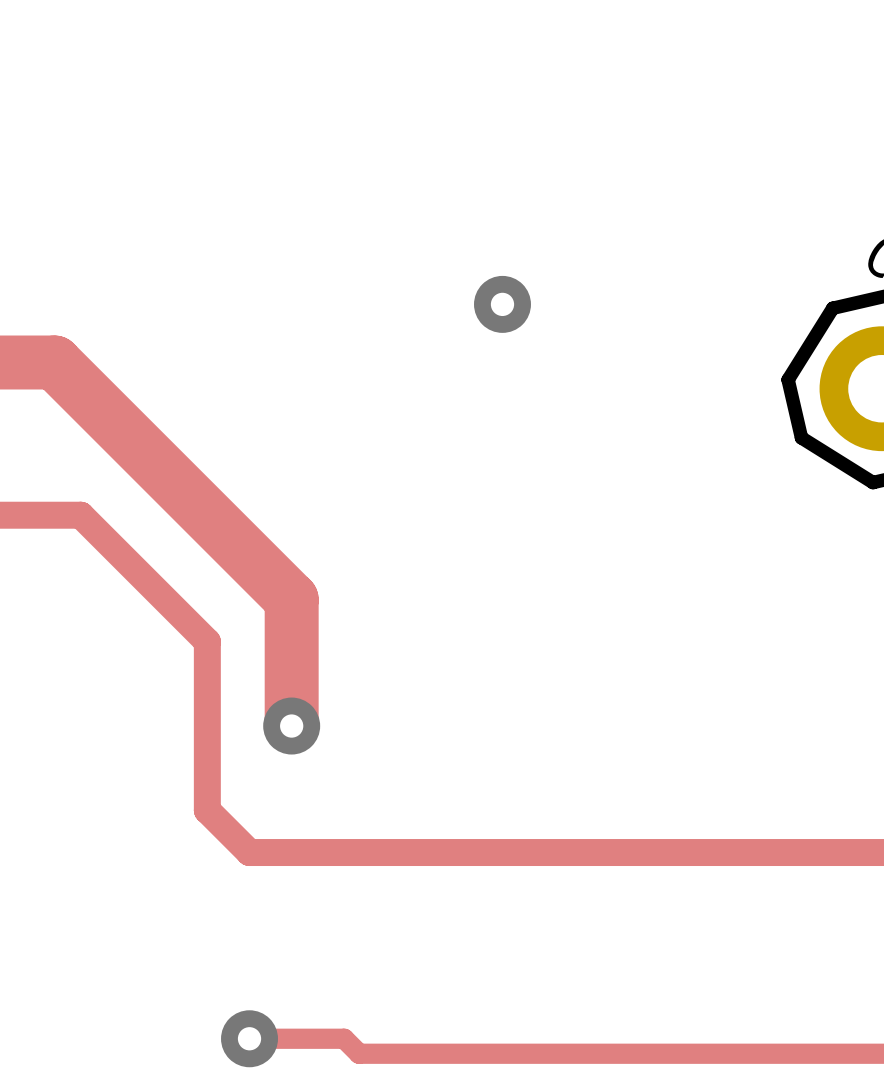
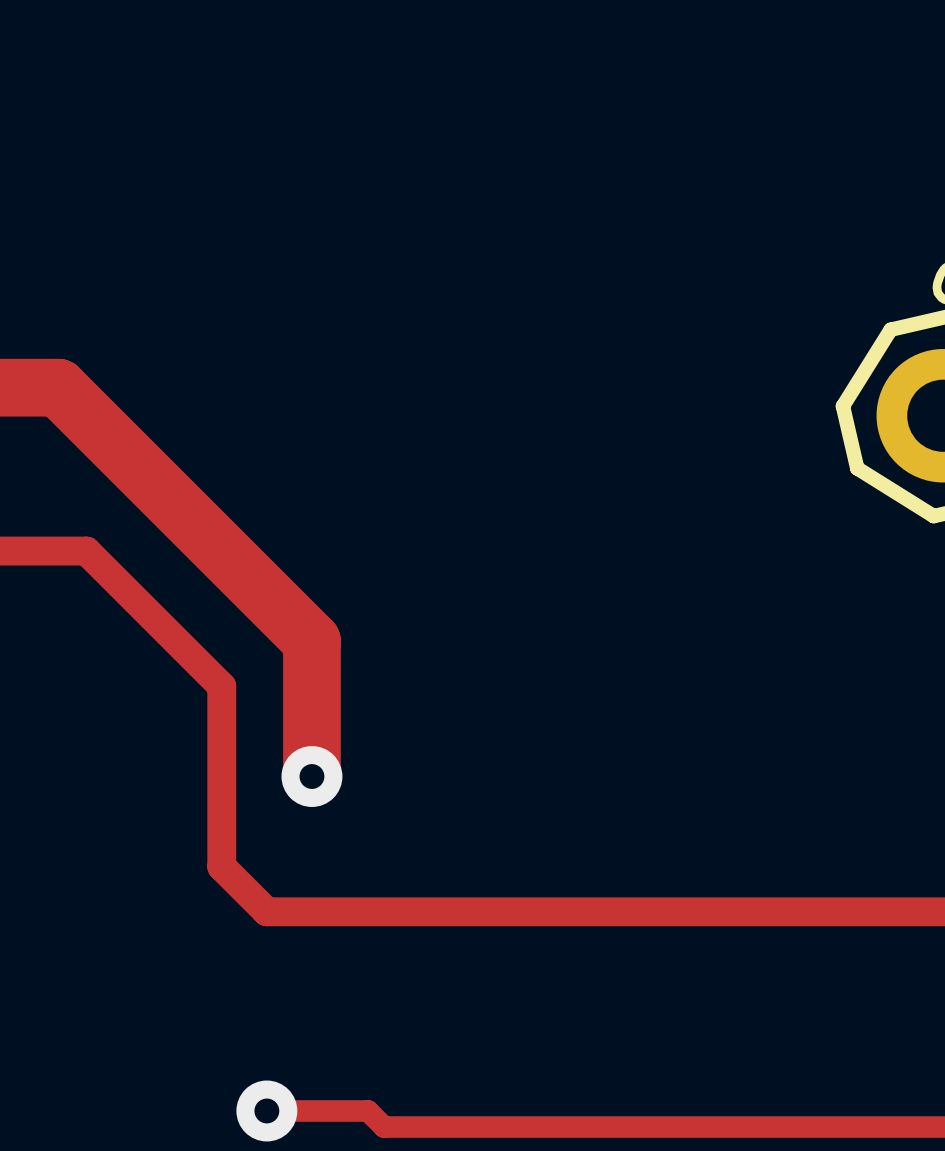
via: (502, 304) -> none

